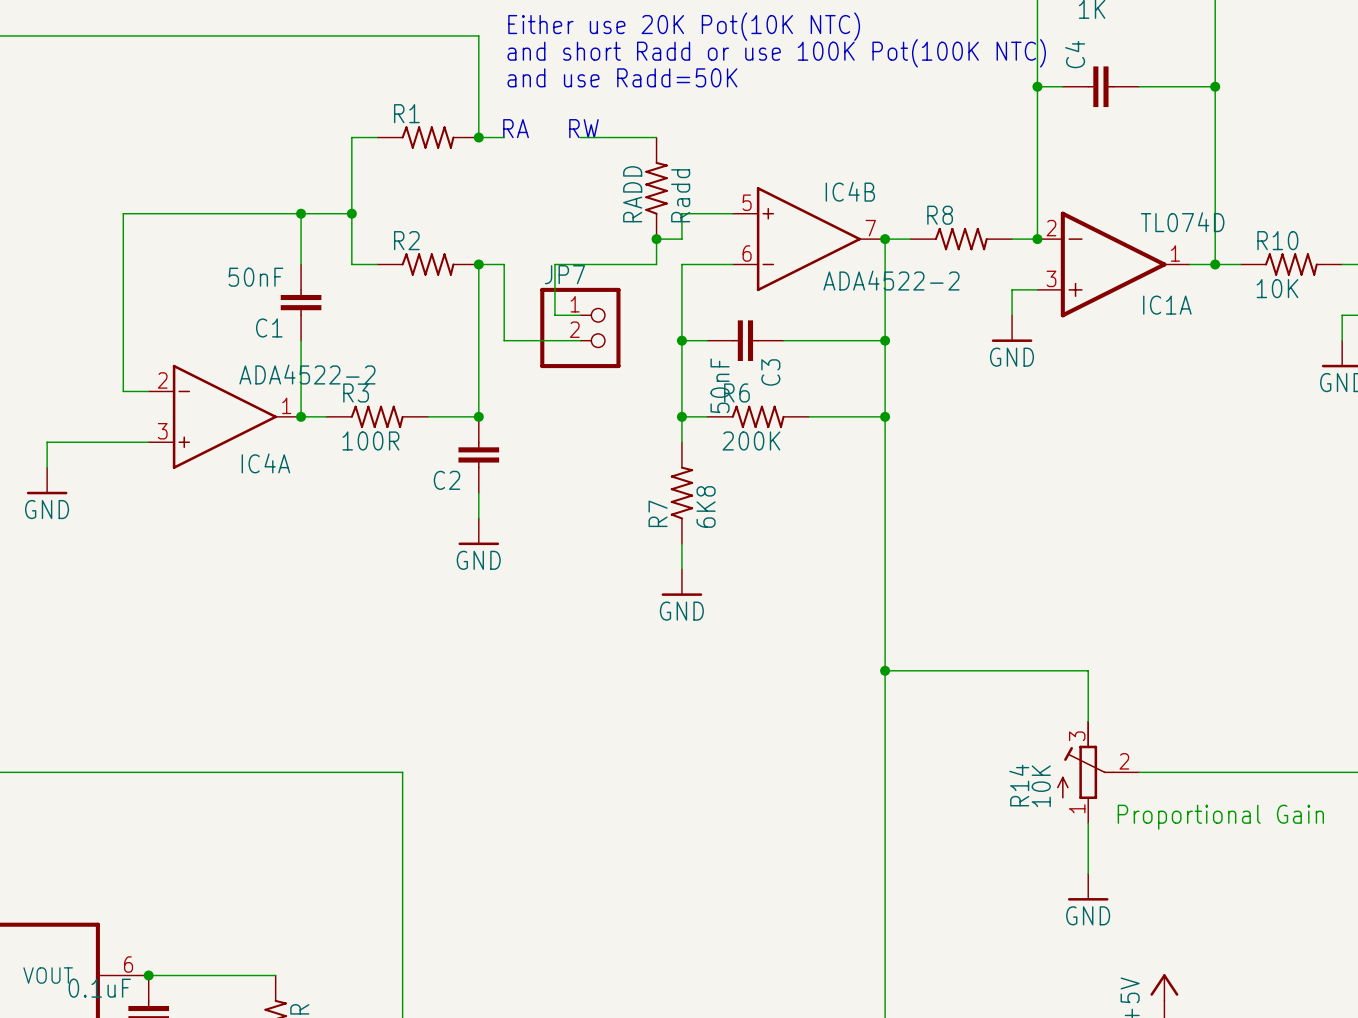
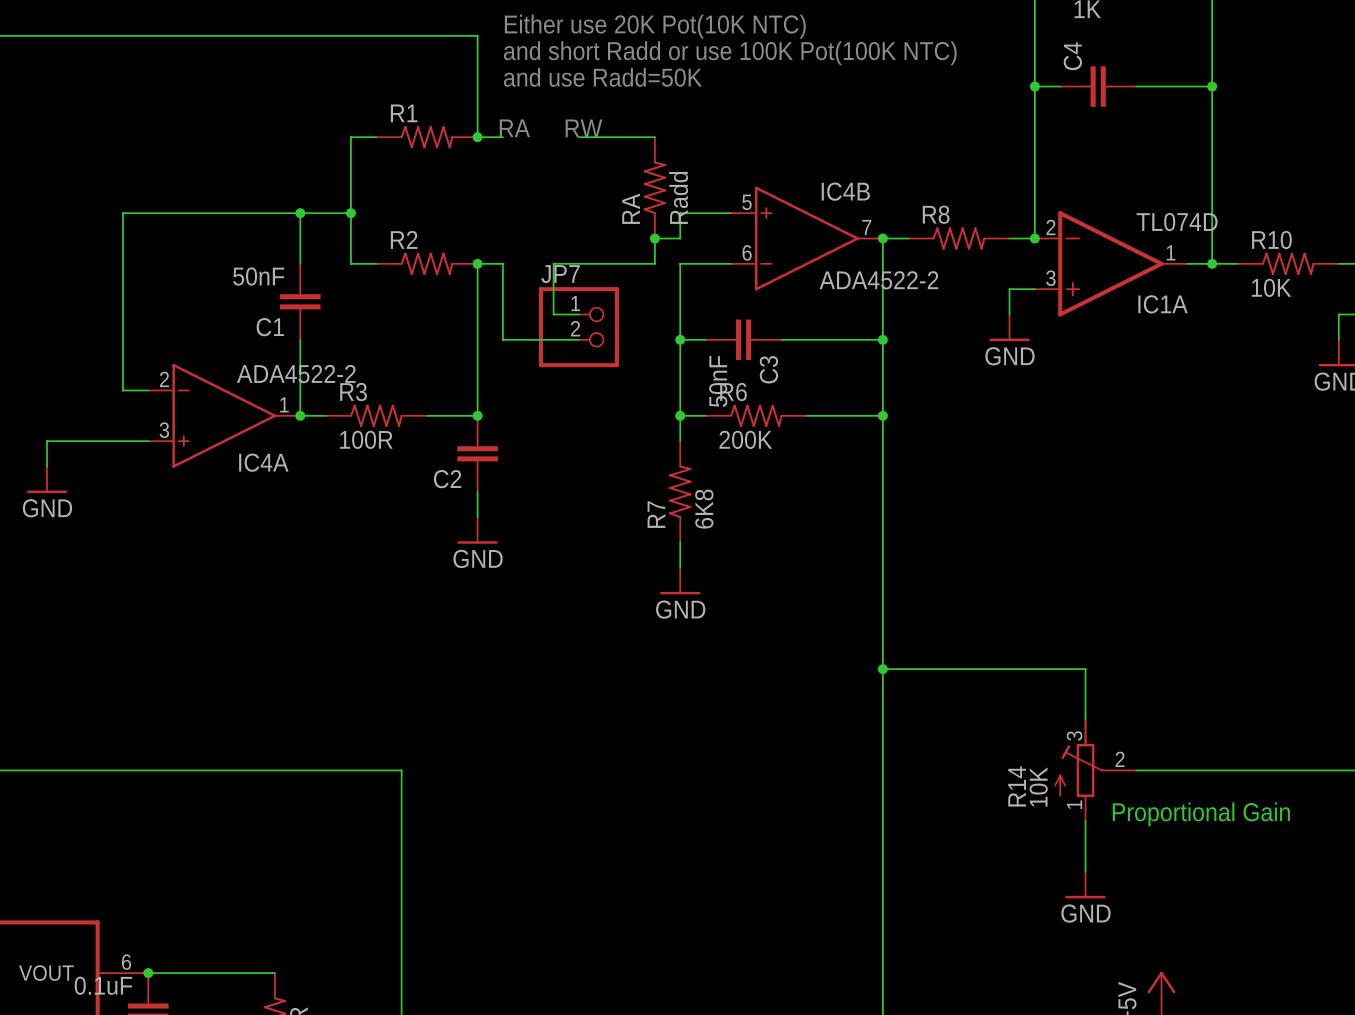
RADD name: RADD (632, 194) -> RA (631, 208)

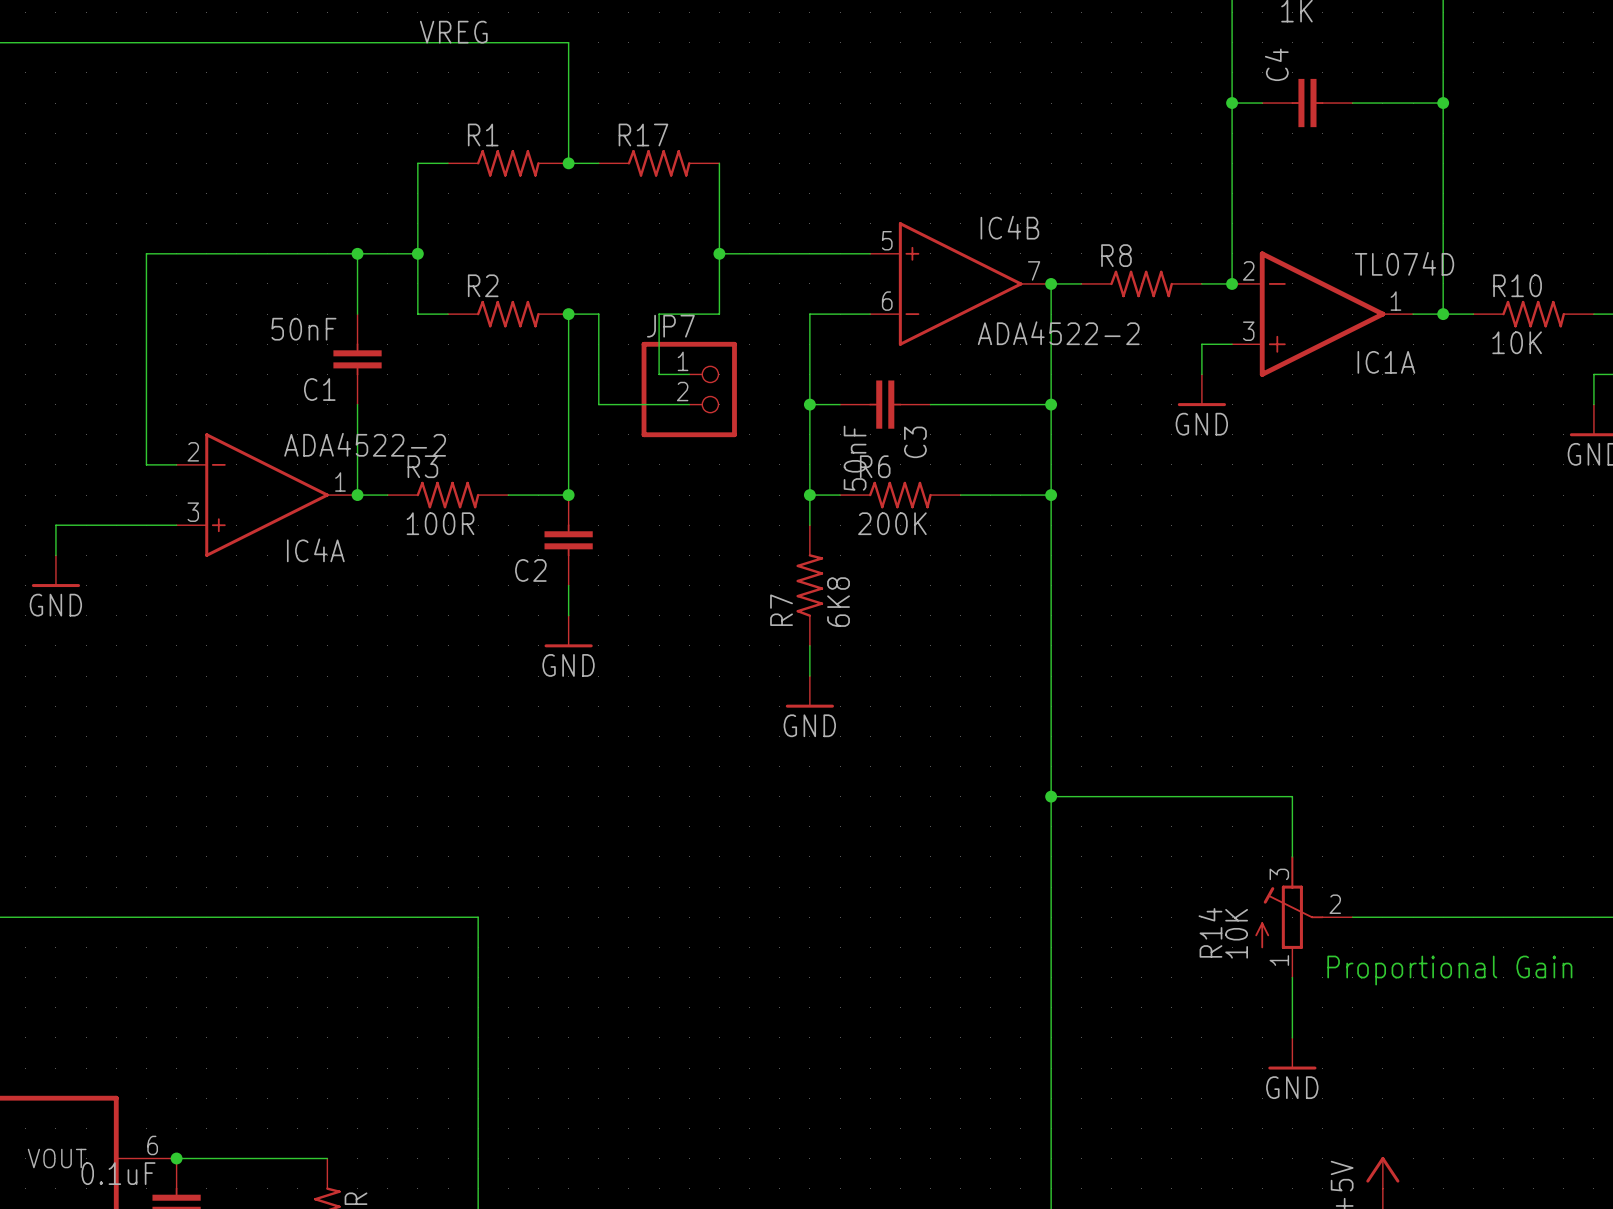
text: Either use 20K Pot(10K NTC) (655, 26) -> none
label: none -> VREG (453, 32)
text: and short Radd or use 100K Pot(100K NTC) (730, 53) -> none
text: and use Radd=50K (602, 77) -> none
text: RA (514, 128) -> none
text: RW (583, 128) -> none
R17: none -> (659, 163)
wire: (578, 137) (654, 137) -> none
wire: none -> (719, 163) (719, 314)
RA: Radd (654, 187) -> none
wire: (680, 213) (680, 238) (654, 238) (654, 263) (604, 263) -> (809, 253) (719, 253)
junction position: (654, 238) -> (719, 253)

